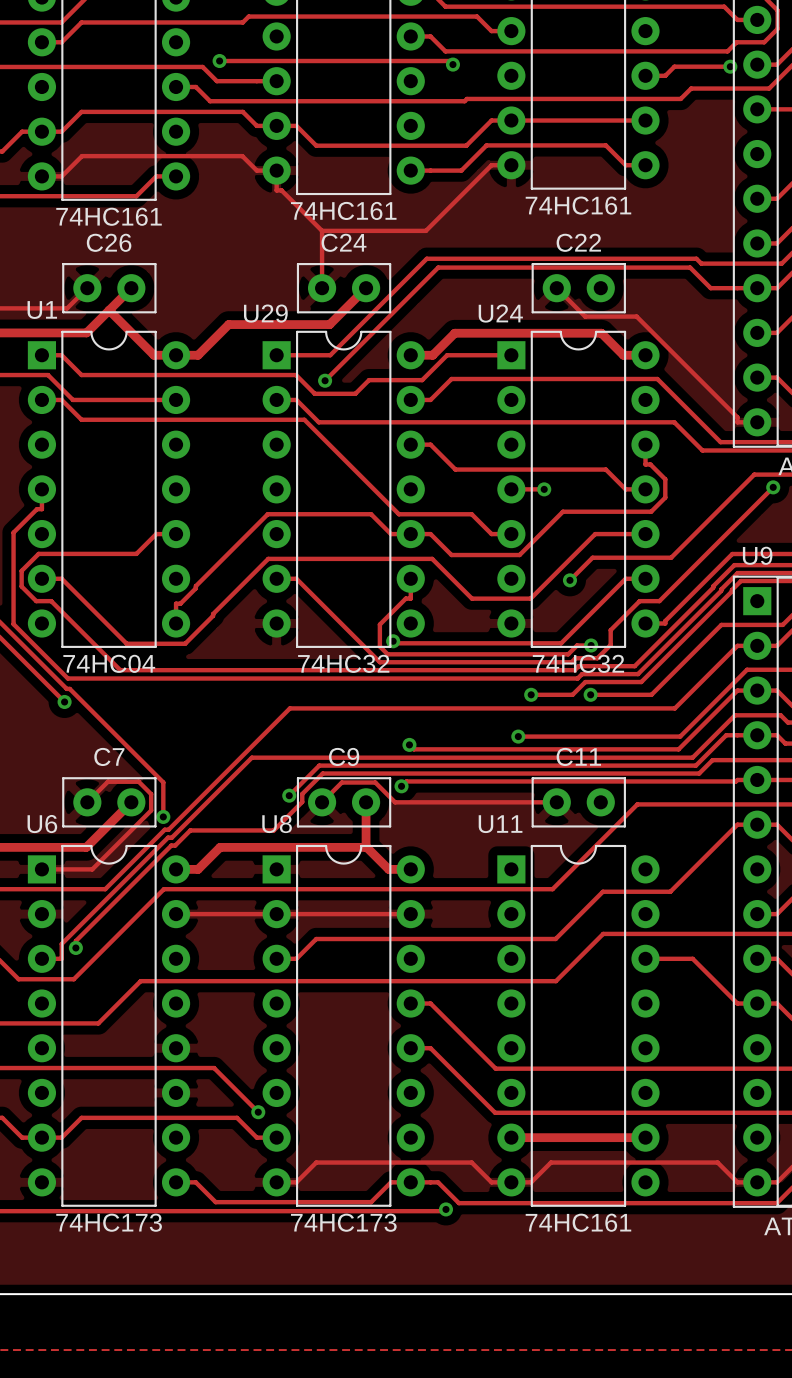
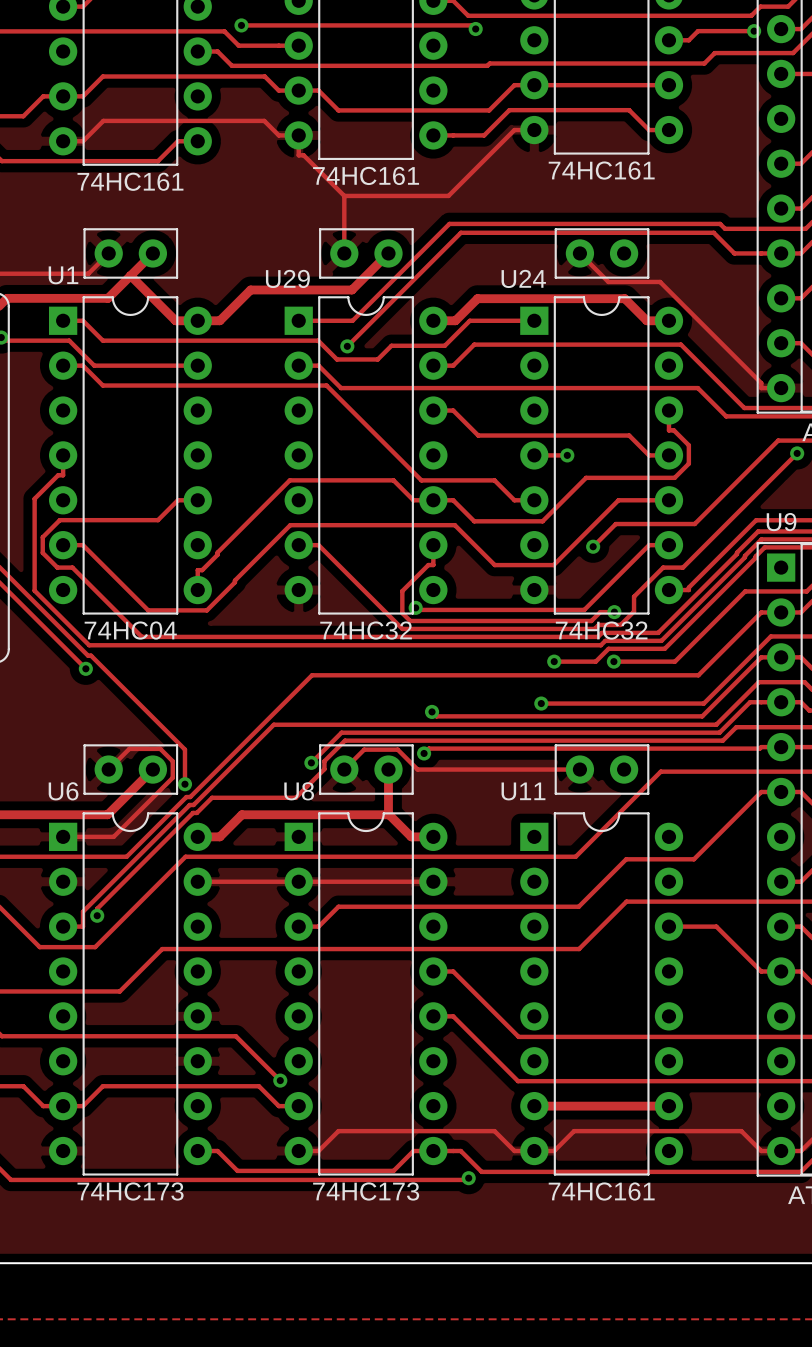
C26 name: C26 (109, 242) -> none
C24 name: C24 (343, 242) -> none
C22 name: C22 (578, 242) -> none
C7 name: C7 (109, 756) -> none
C9 name: C9 (344, 756) -> none
C11 name: C11 (578, 756) -> none

